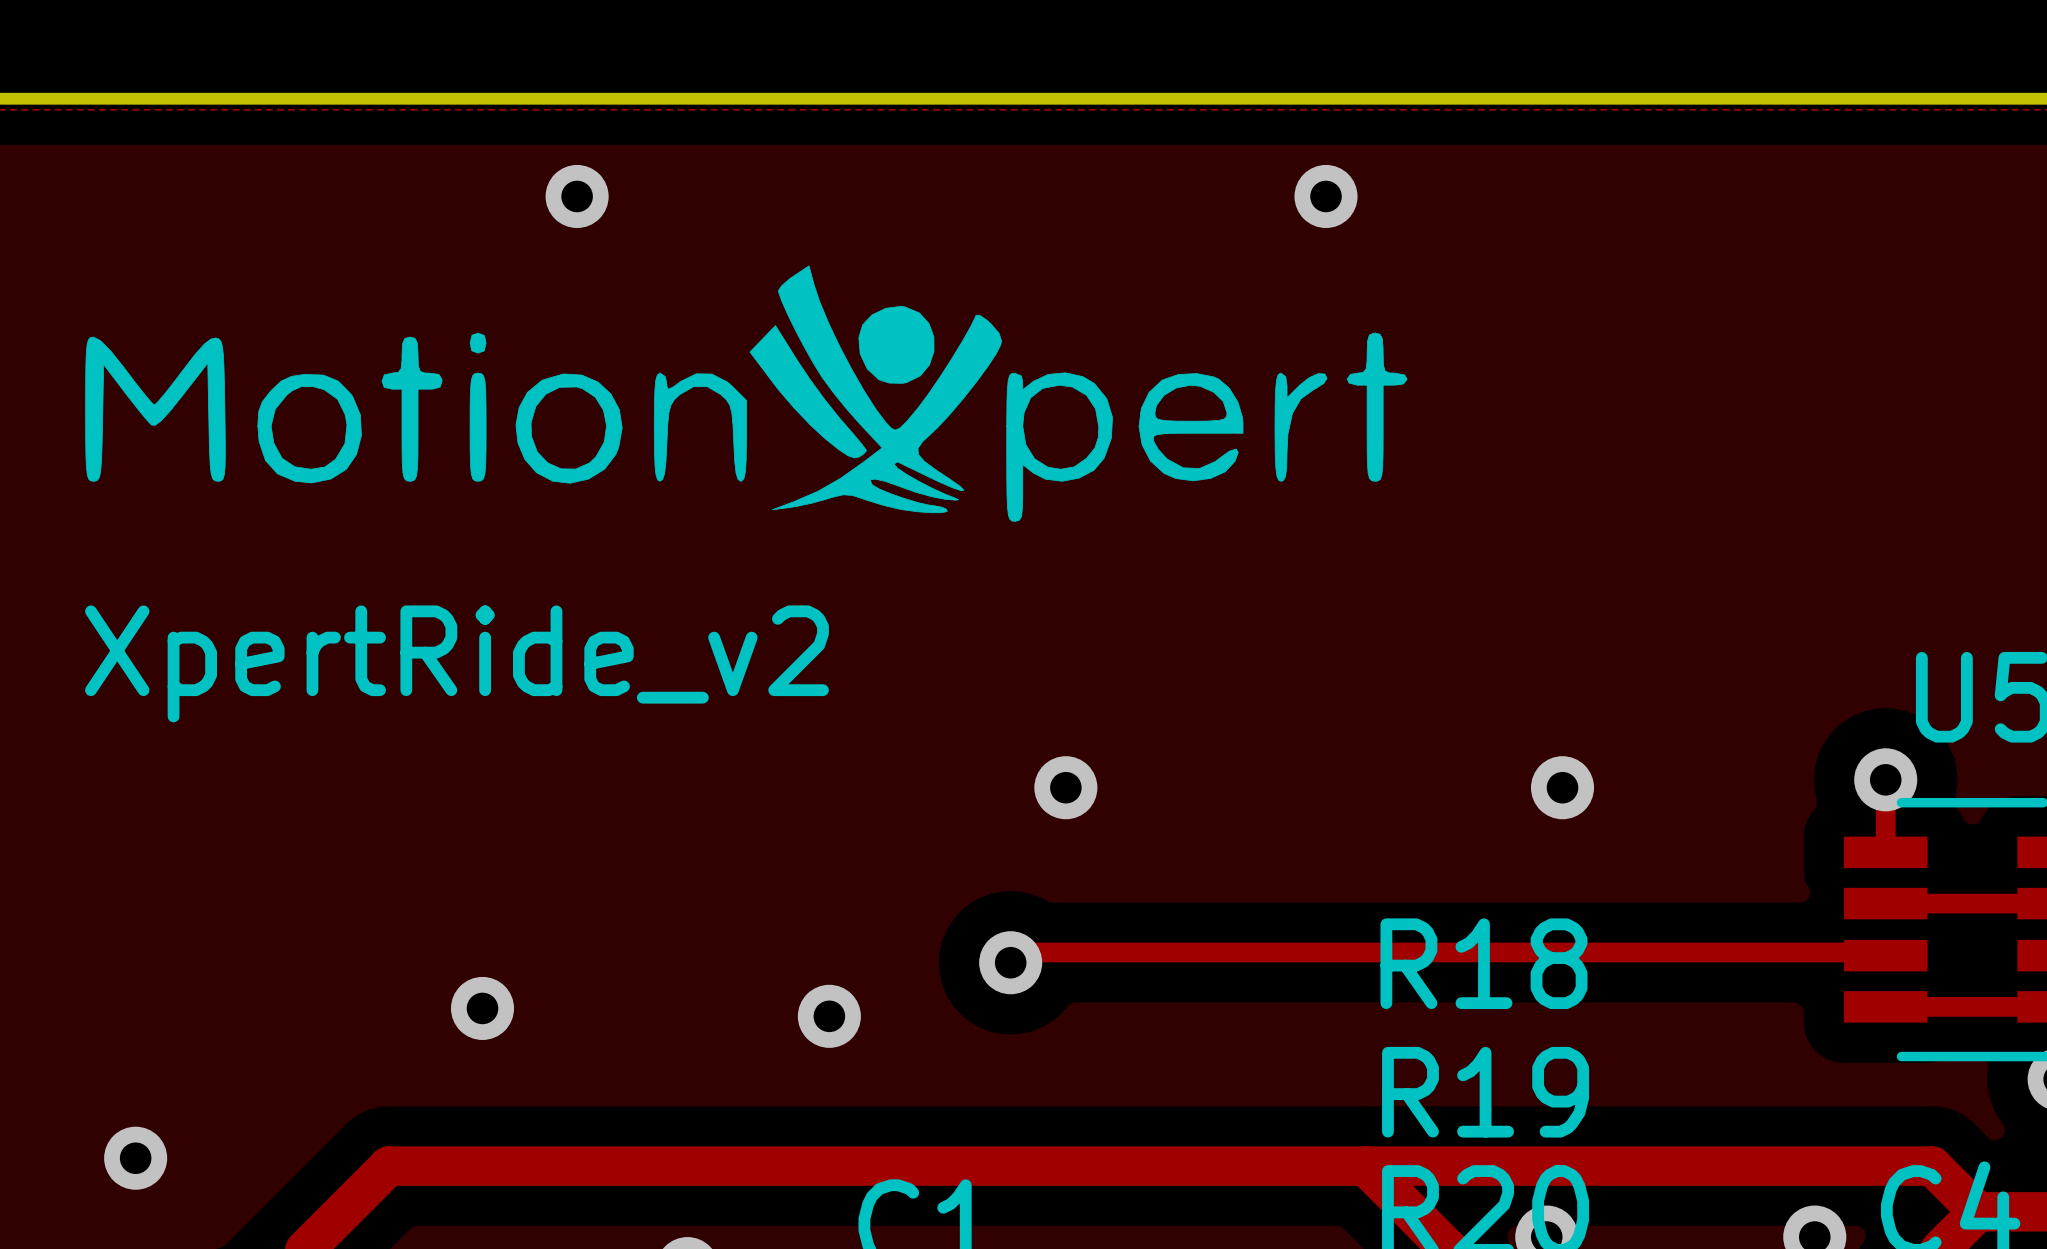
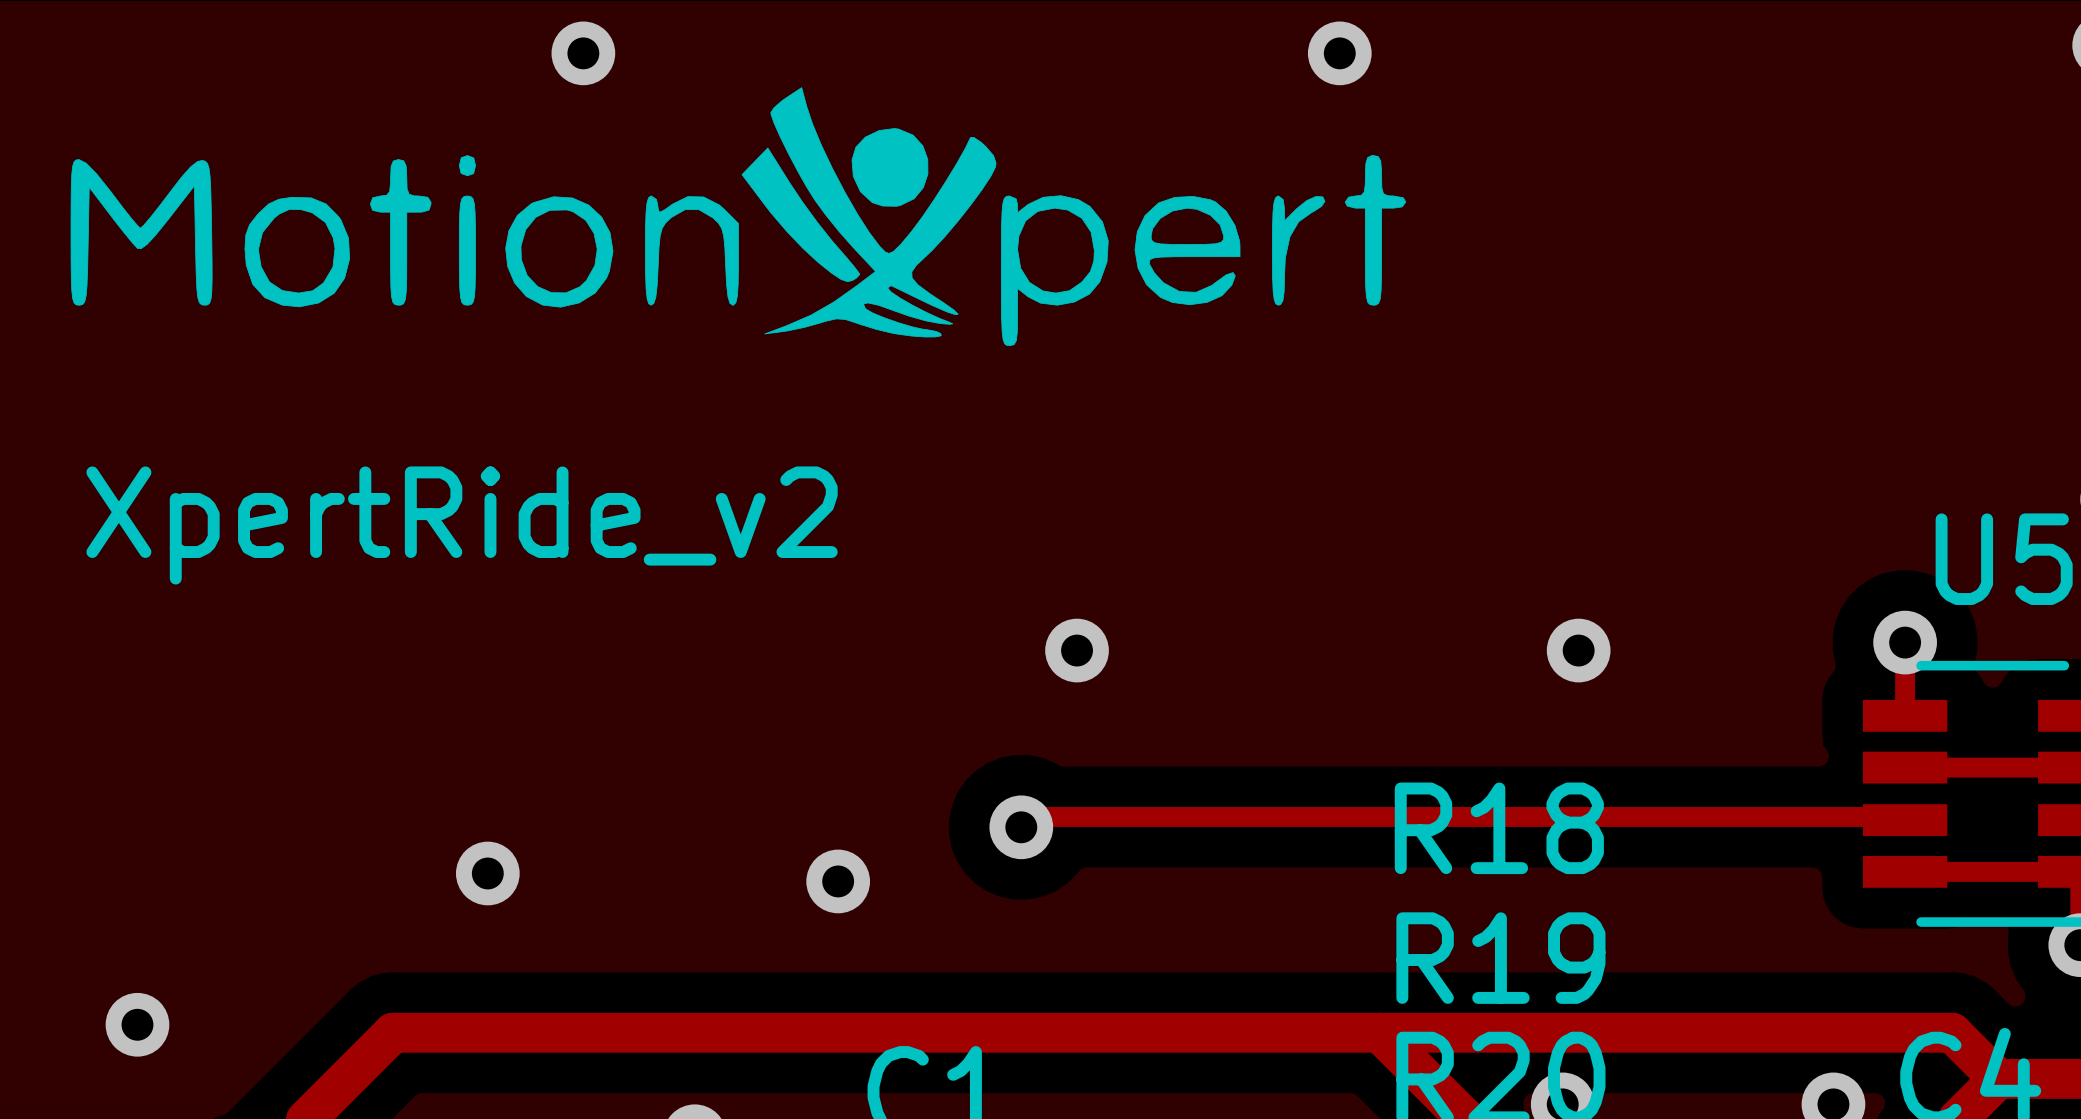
drawing position: (746, 393) -> (738, 216)

